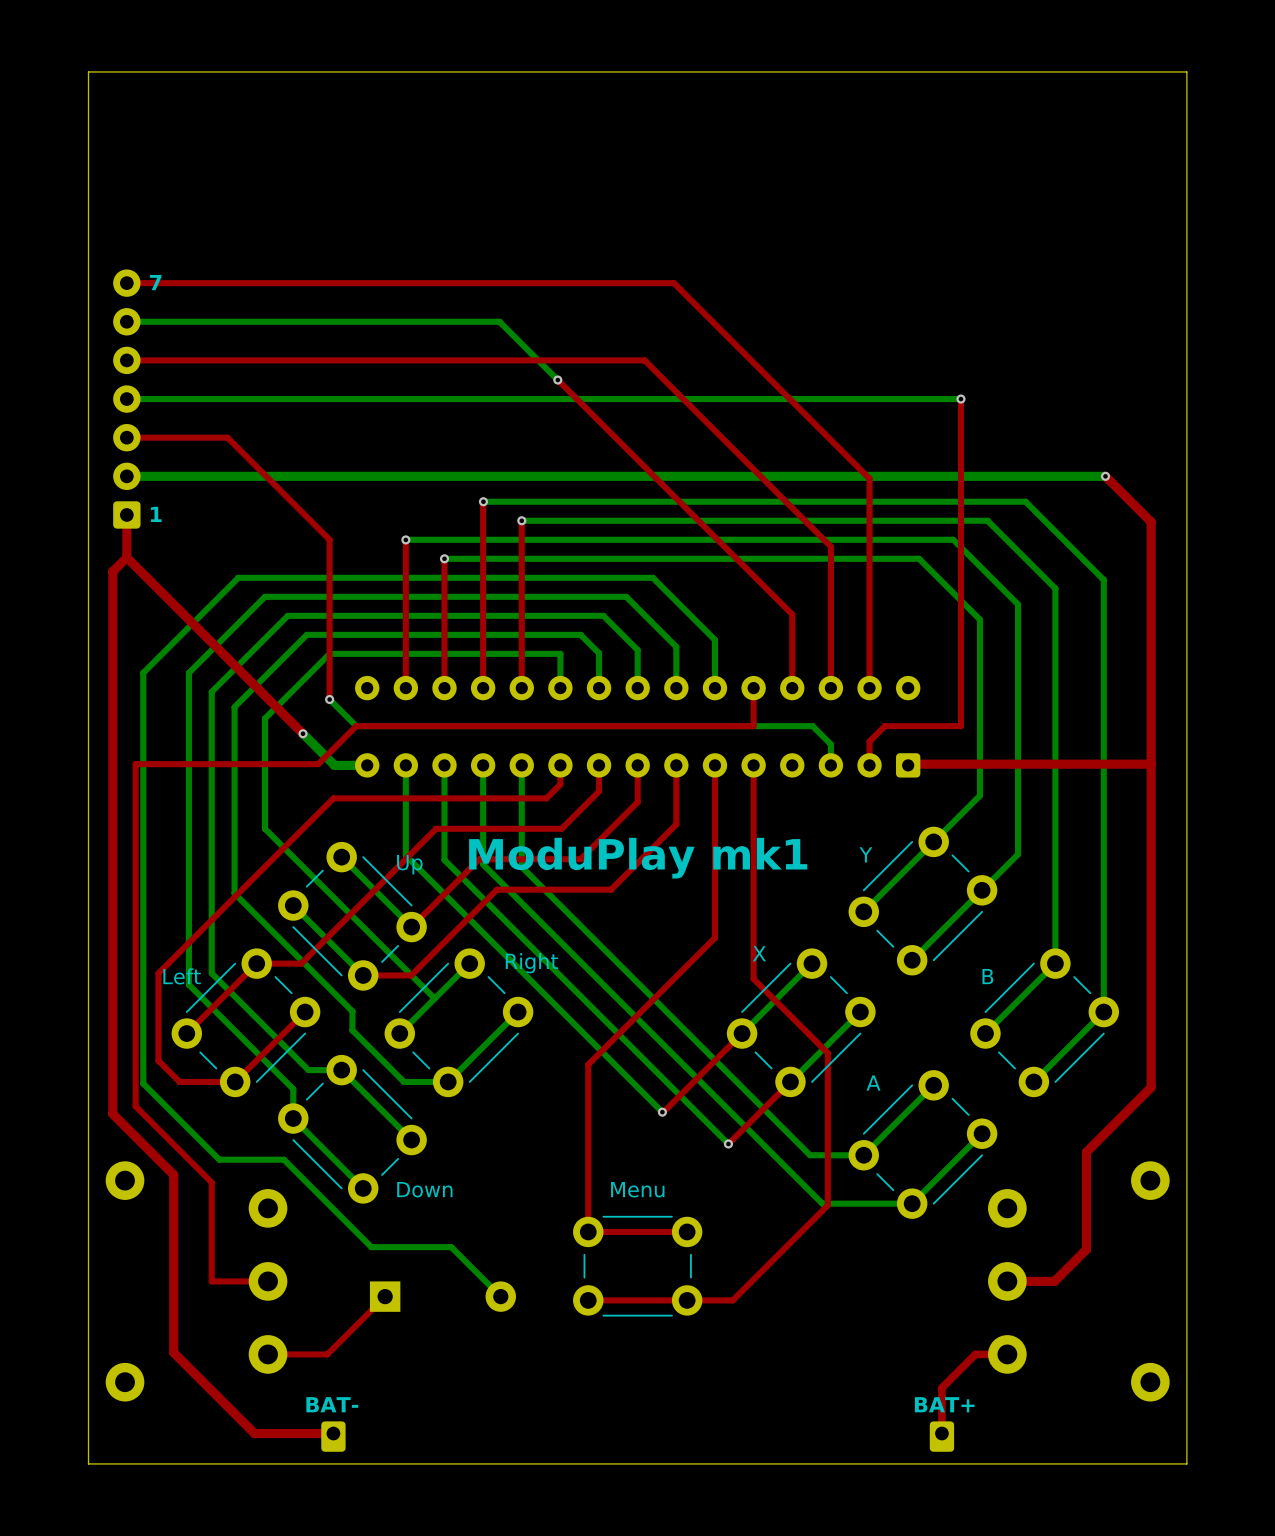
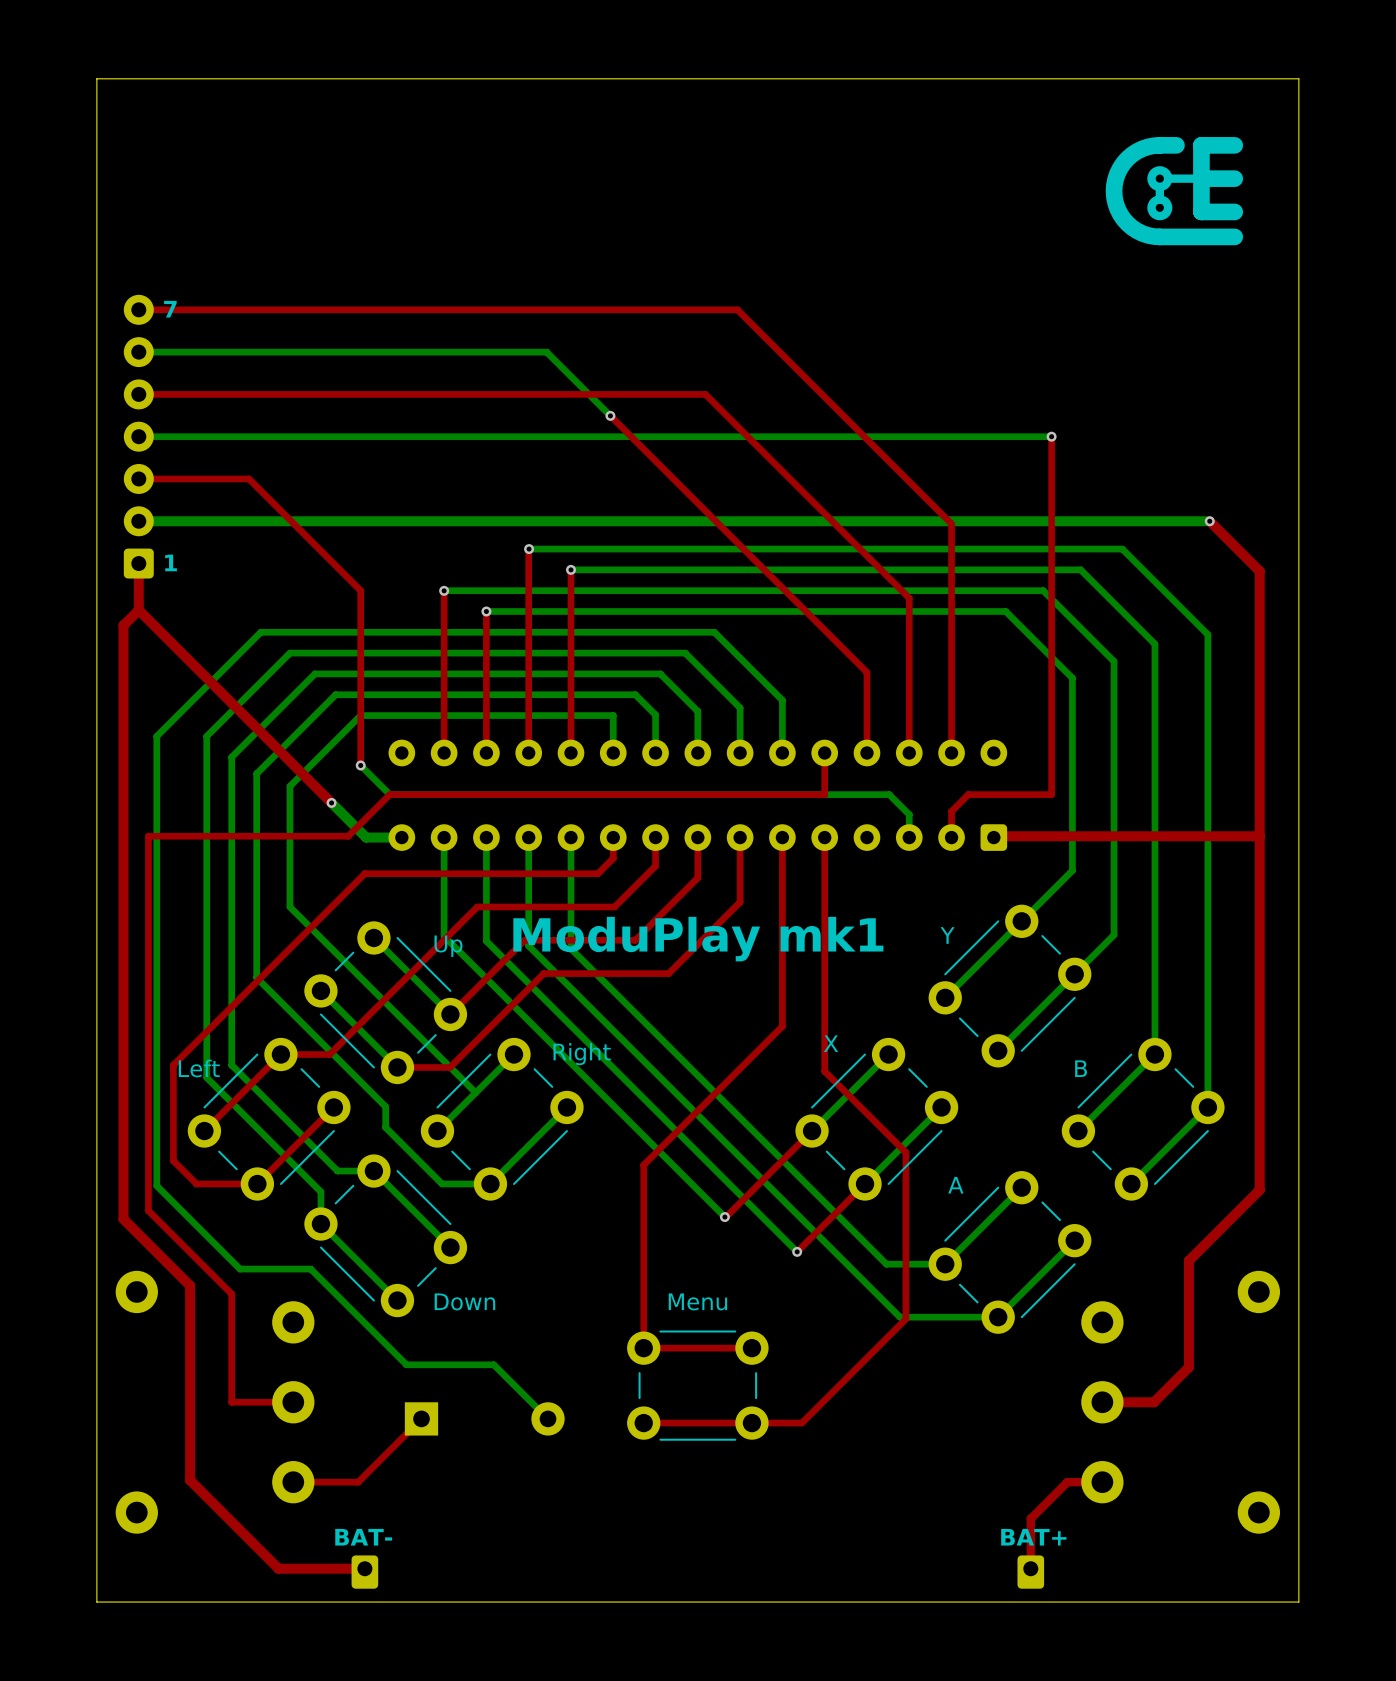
drawing: none -> [1105, 137, 1244, 246]

